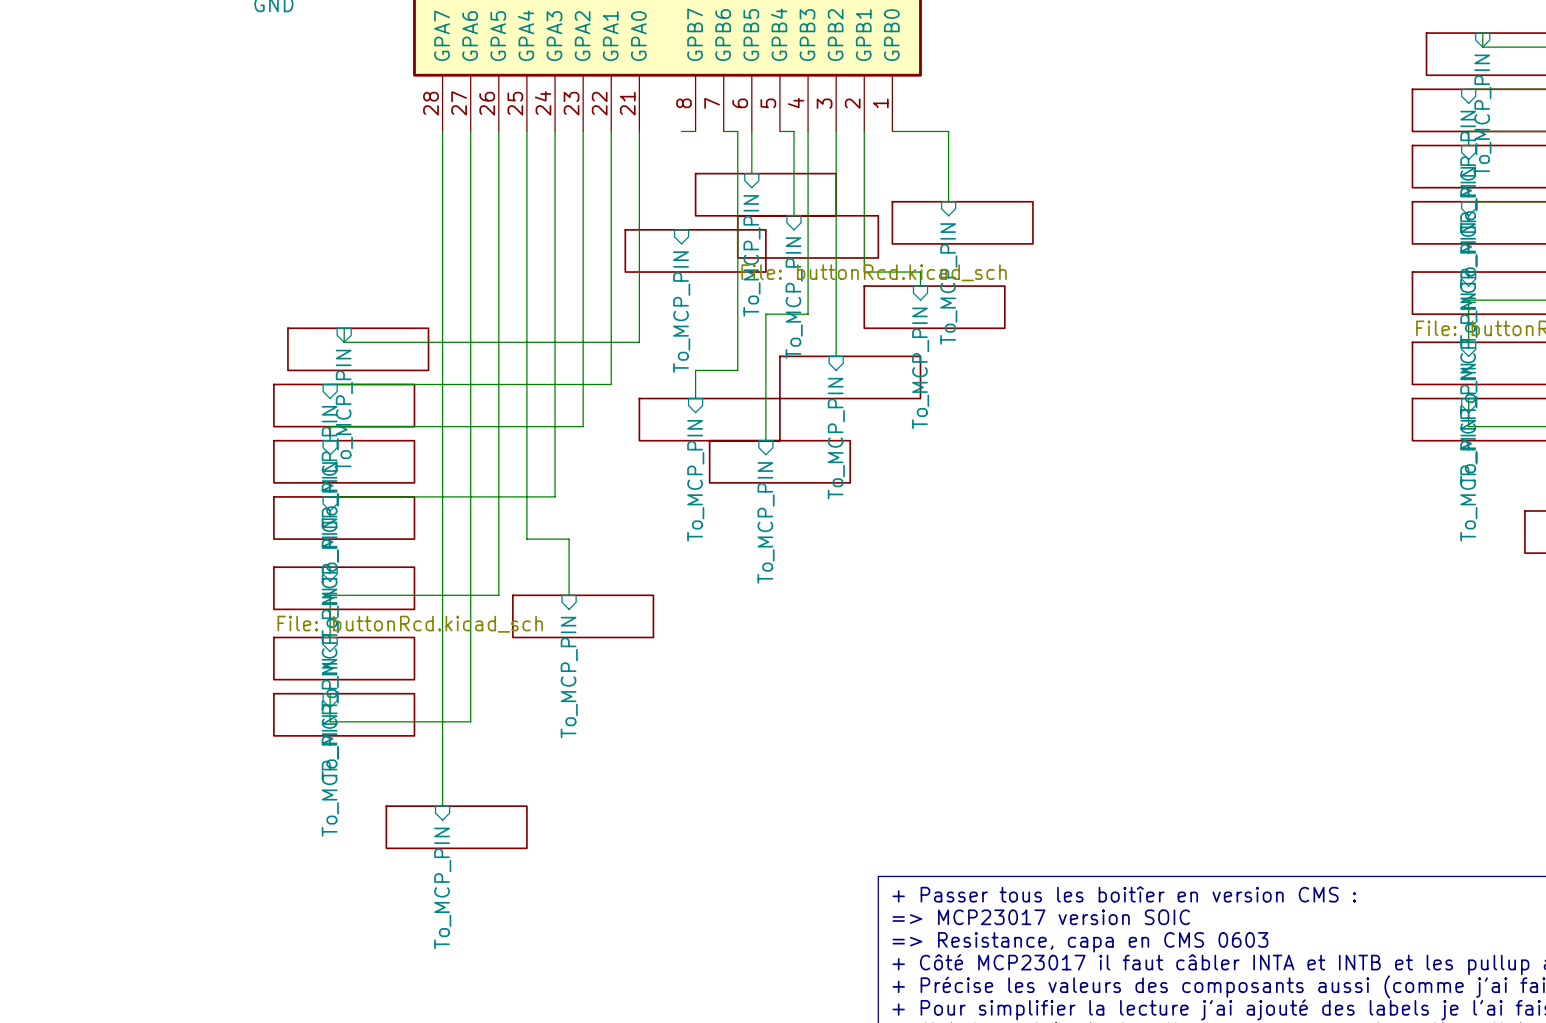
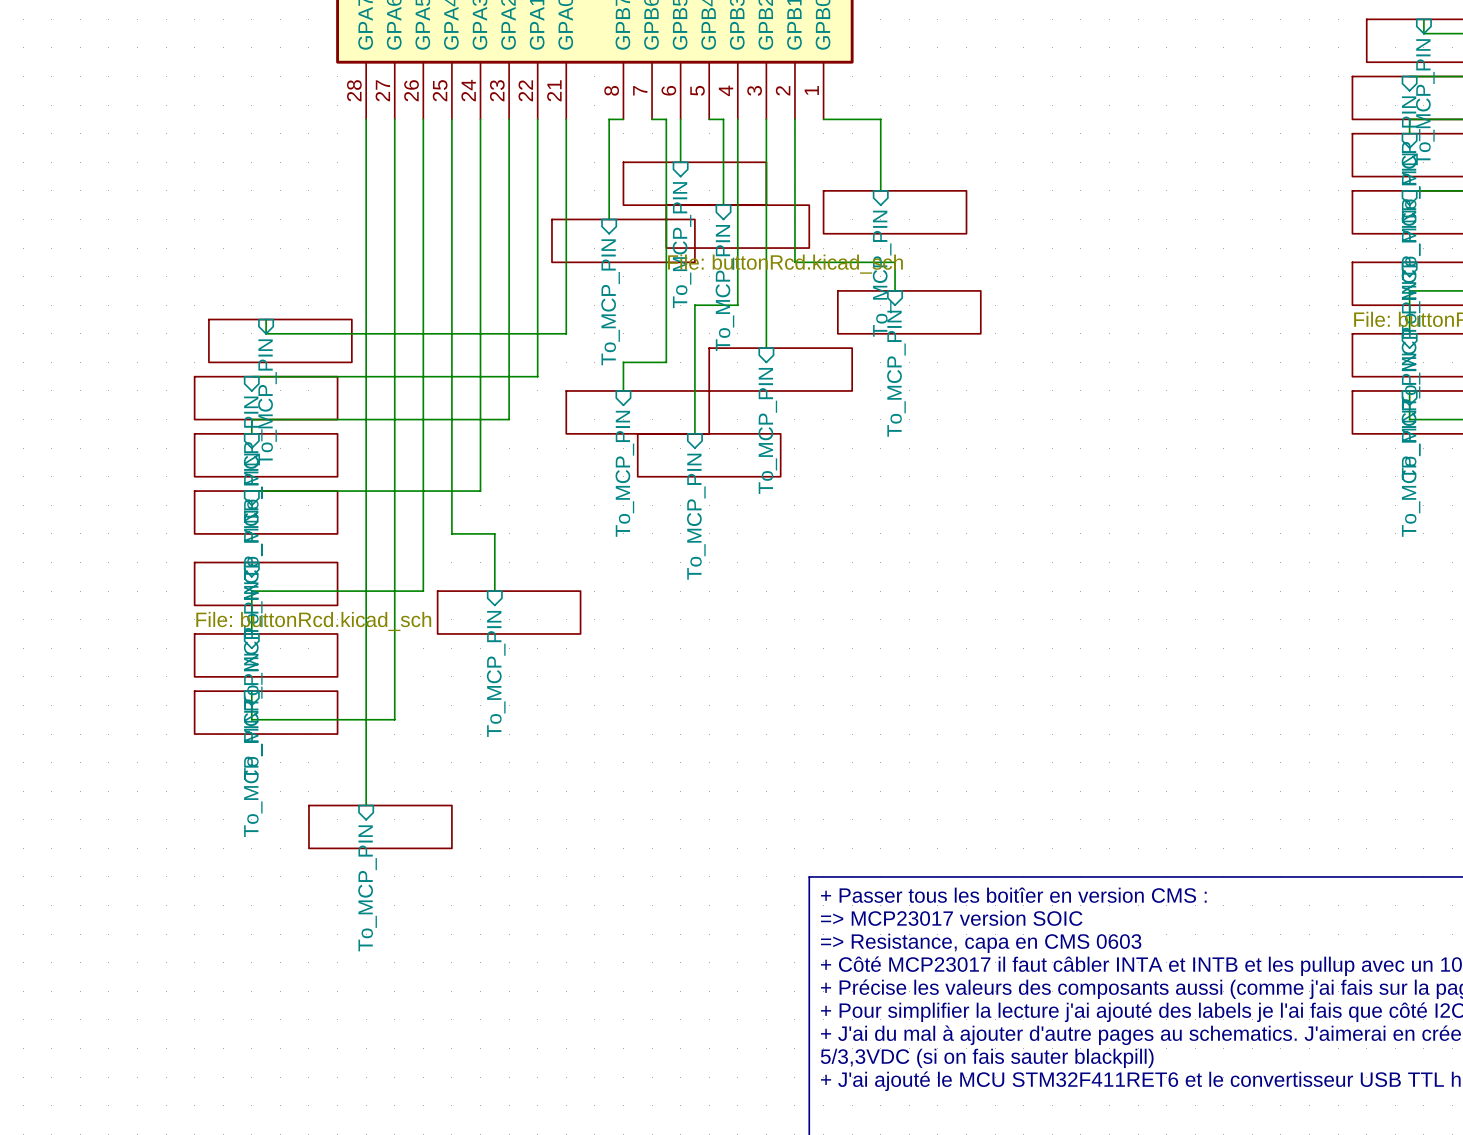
wire: none -> (609, 119) (609, 219)
wire: (920, 272) (920, 286) -> (852, 262) (895, 262) (895, 290)
sheet position: (934, 307) -> (909, 312)
sheet pin position: To_MCP_PIN (920, 368) -> To_MCP_PIN (896, 373)

